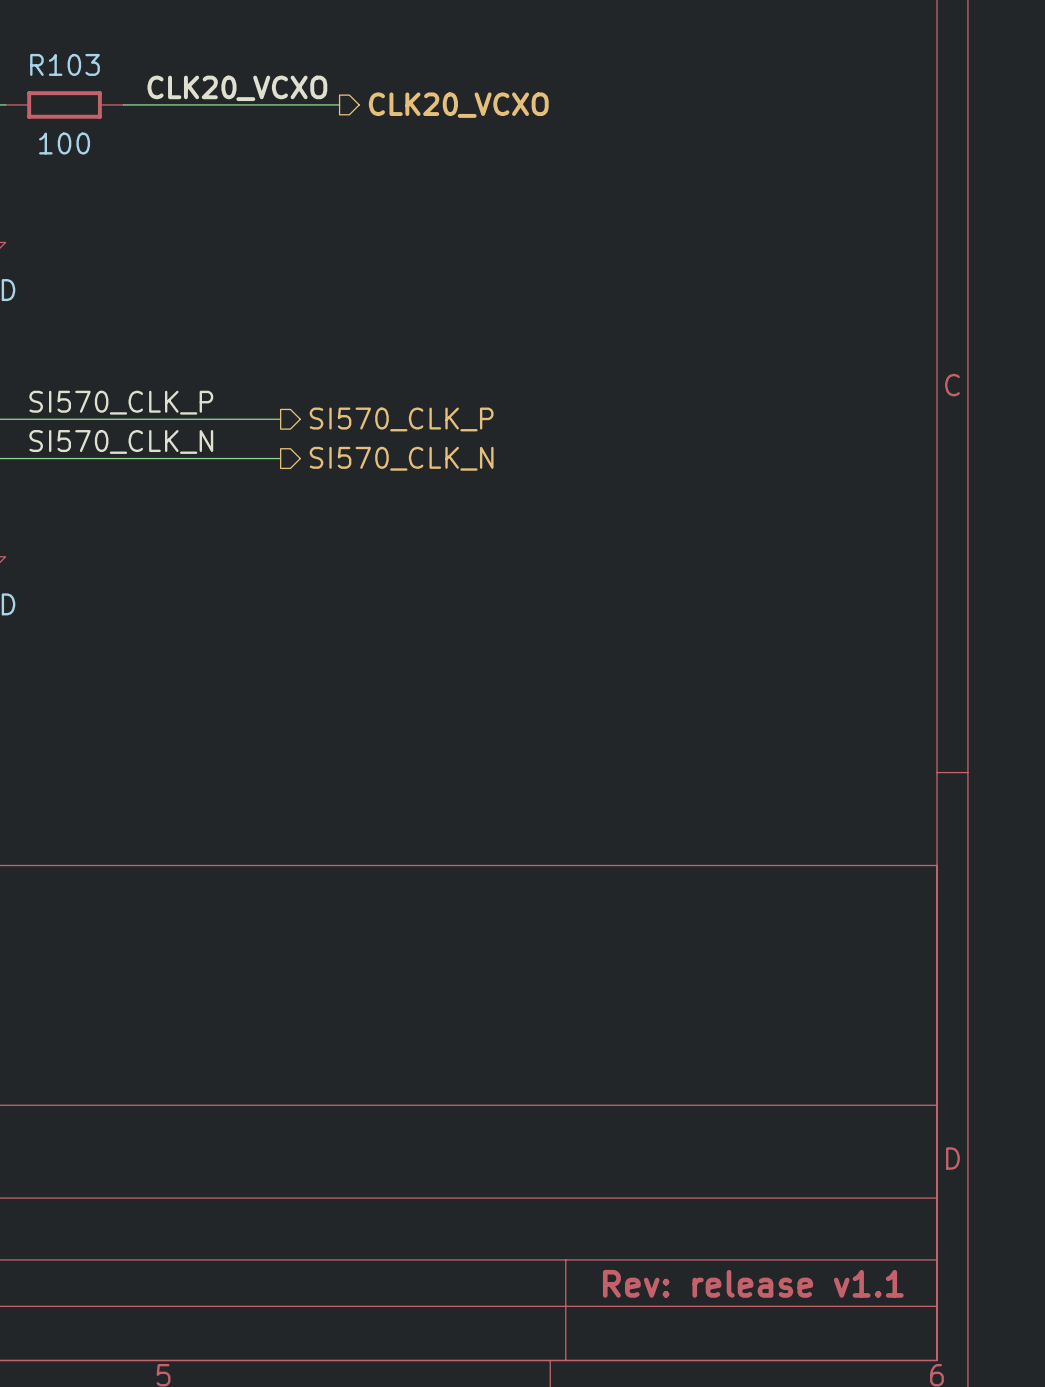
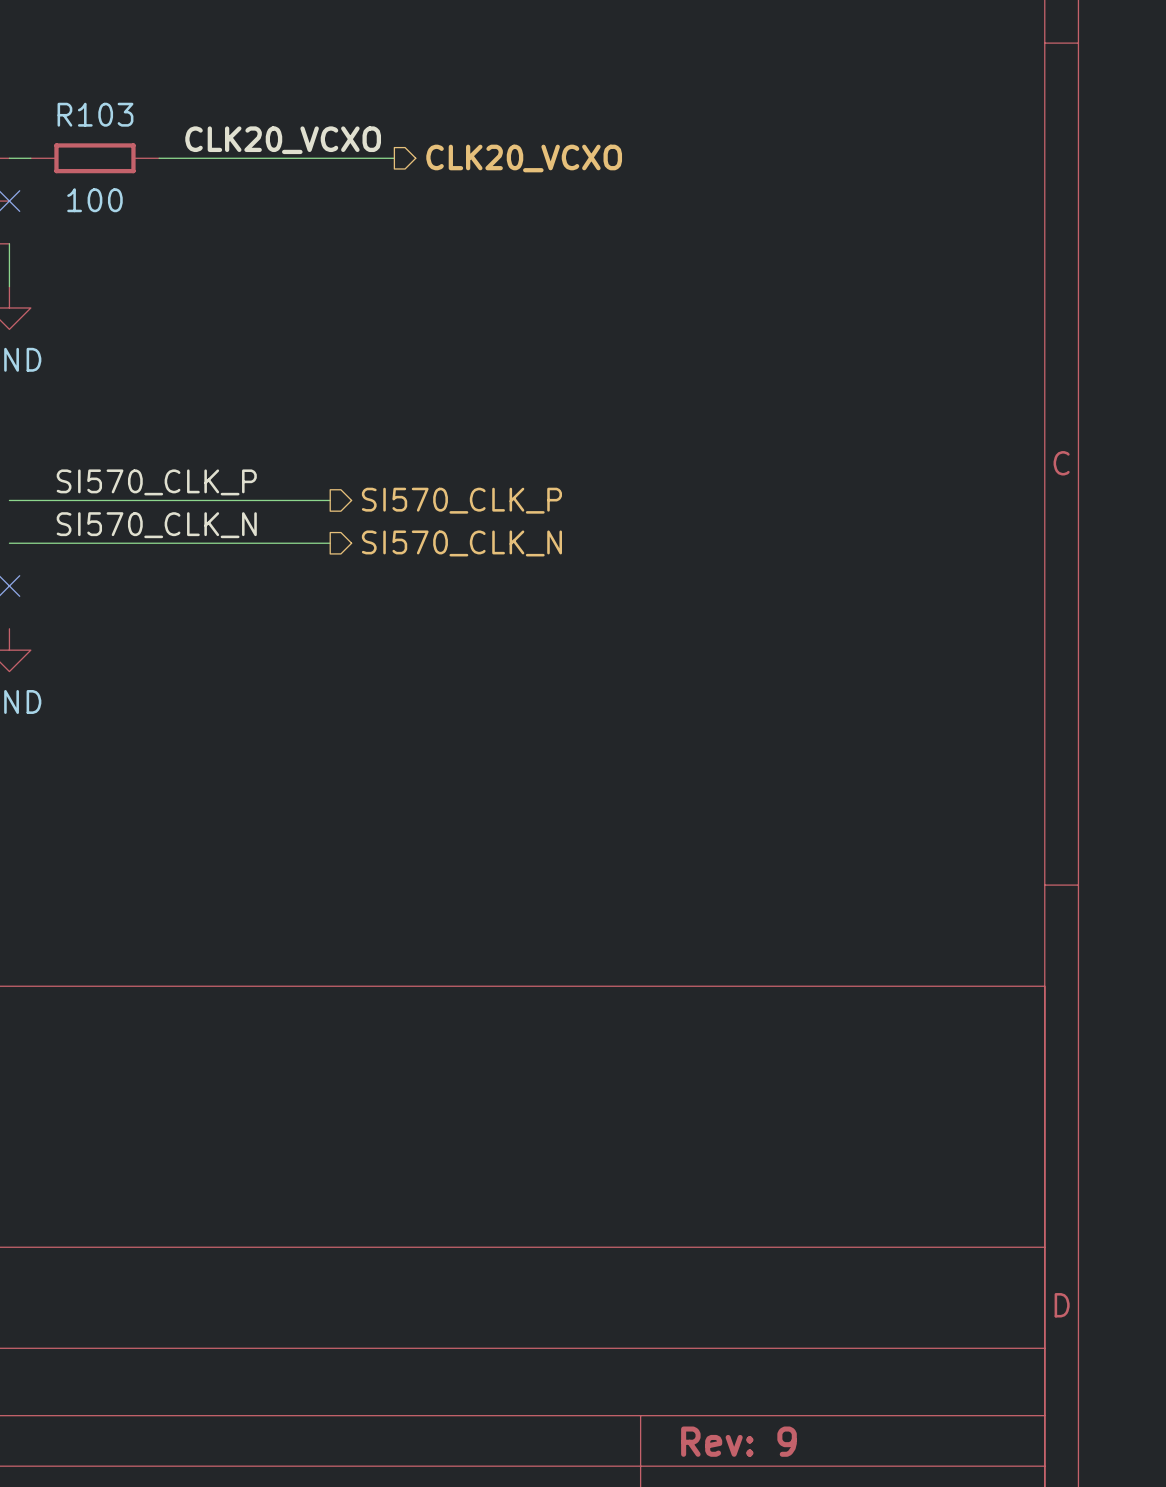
title block: Rev: release v1.1 (753, 1283) -> Rev: 9 (738, 1441)

